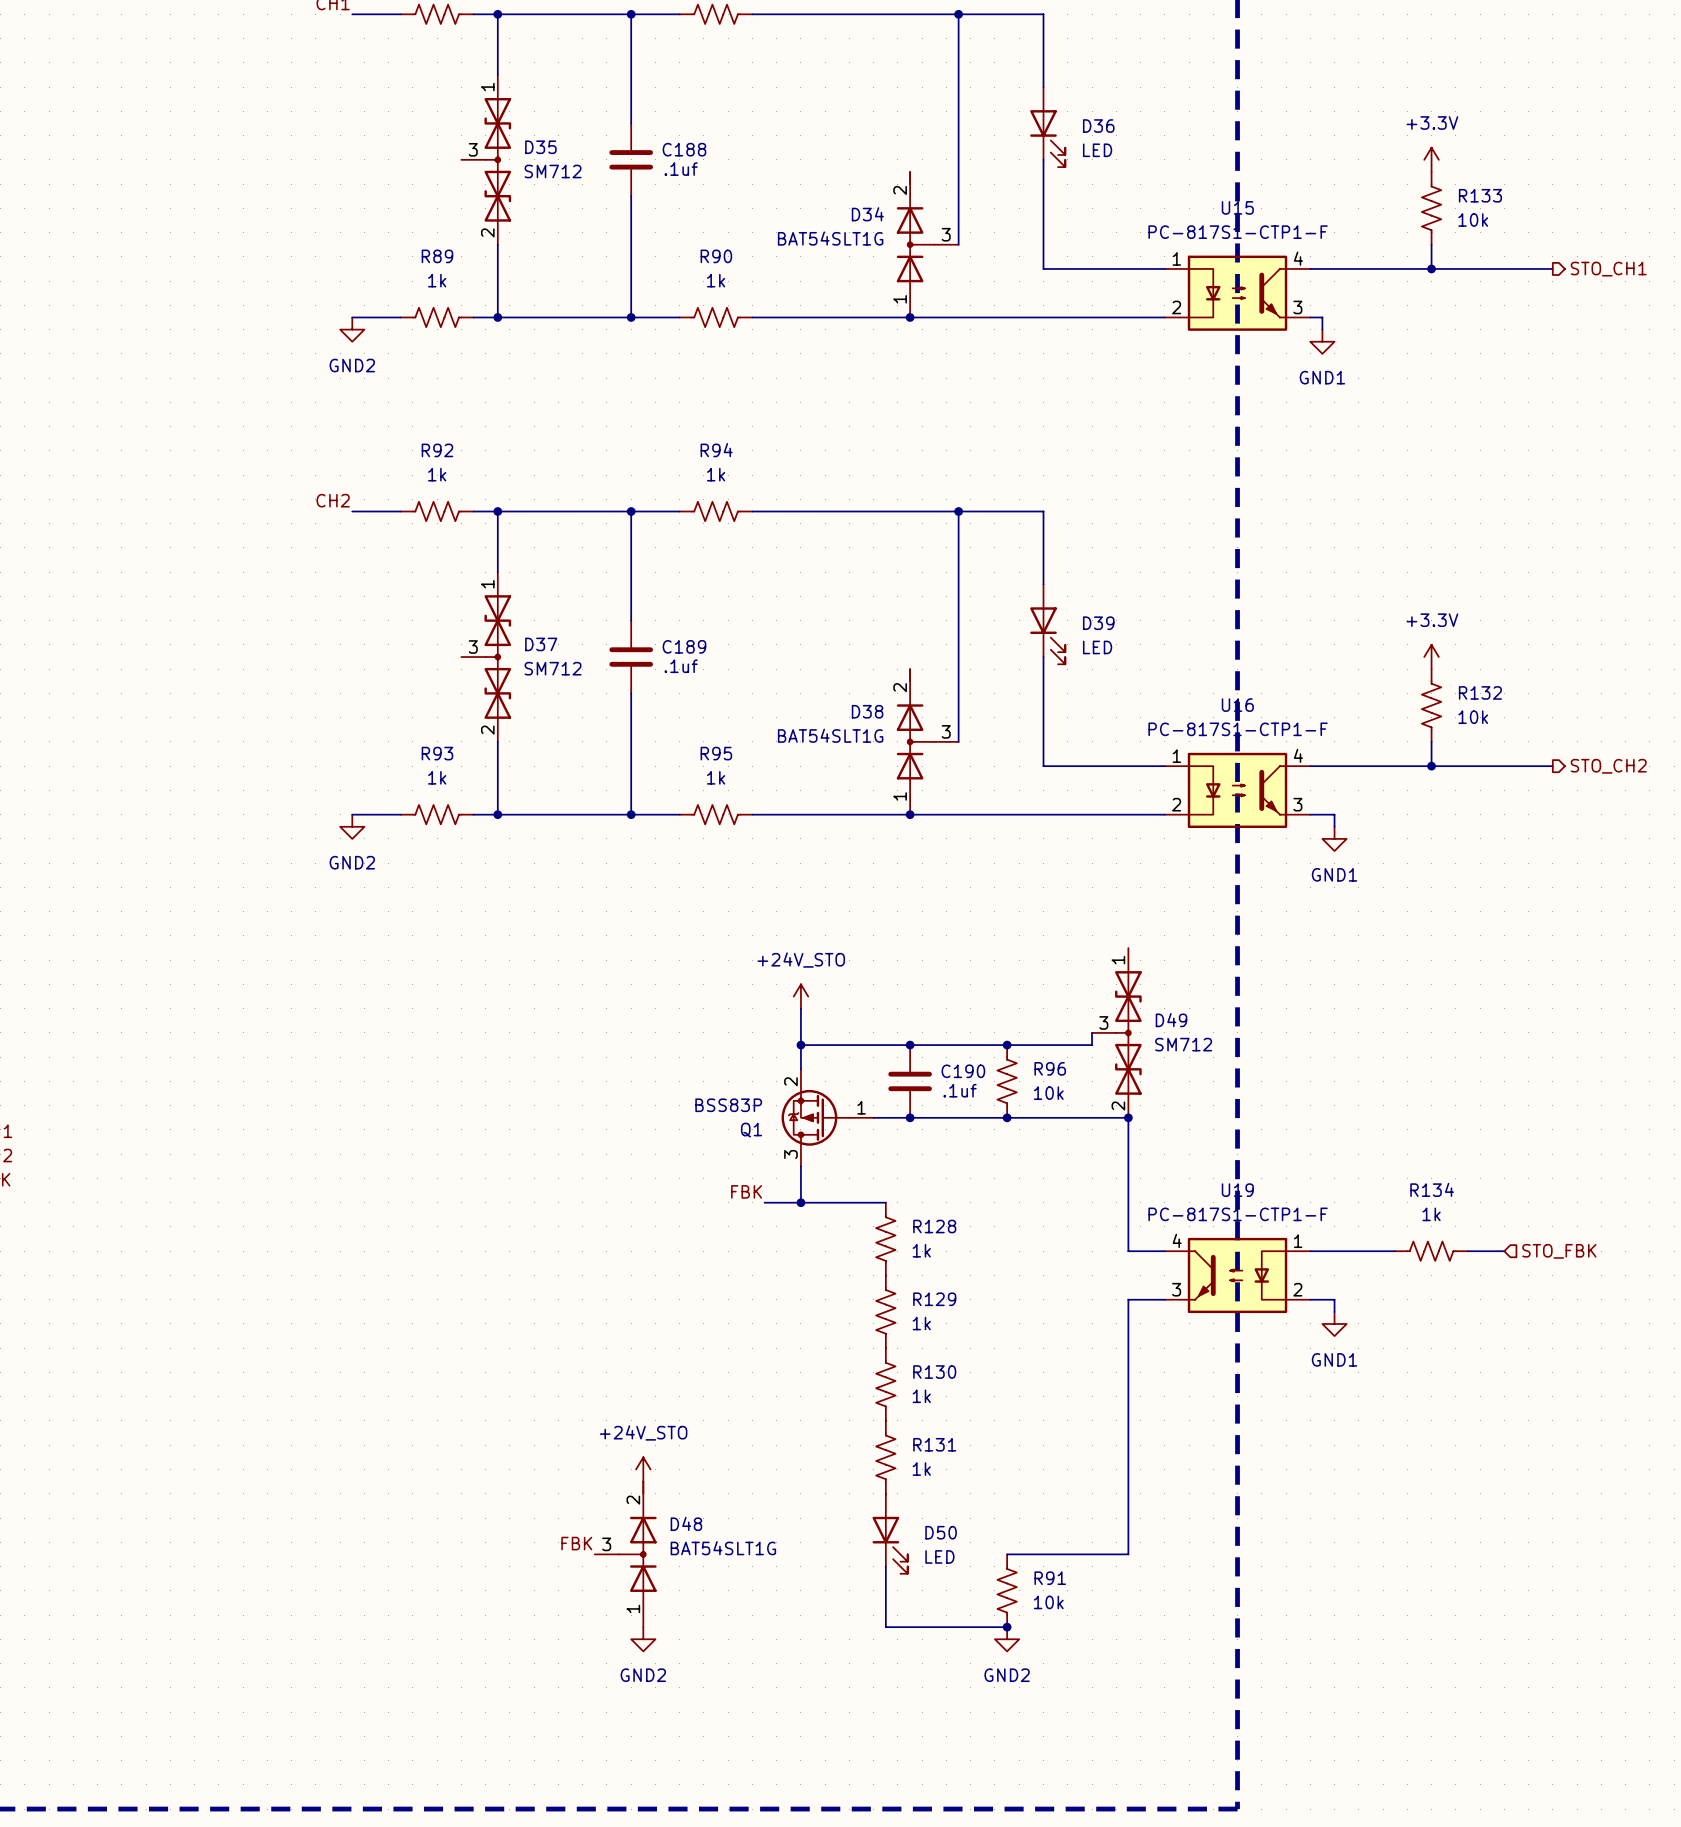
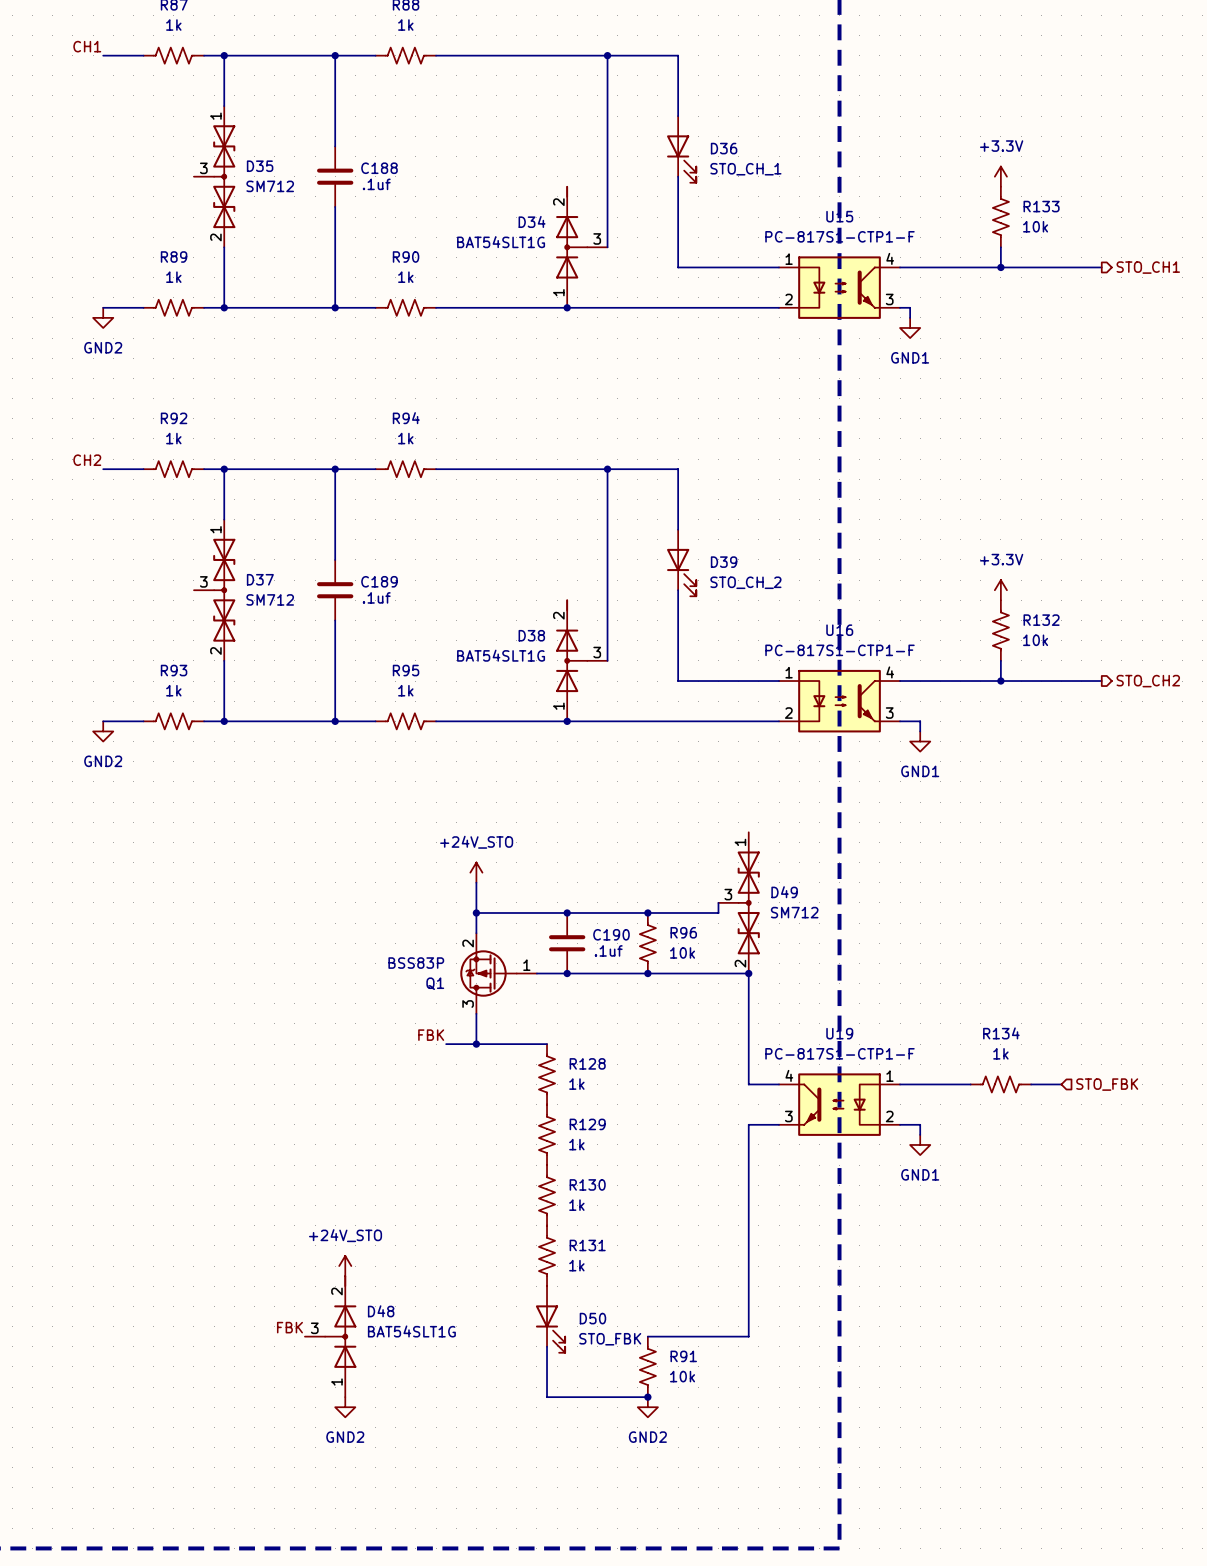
D36 value: LED (1097, 150) -> STO_CH_1 (745, 169)
D39 value: LED (1097, 647) -> STO_CH_2 (745, 582)
D50 value: LED (939, 1556) -> STO_FBK (610, 1339)

